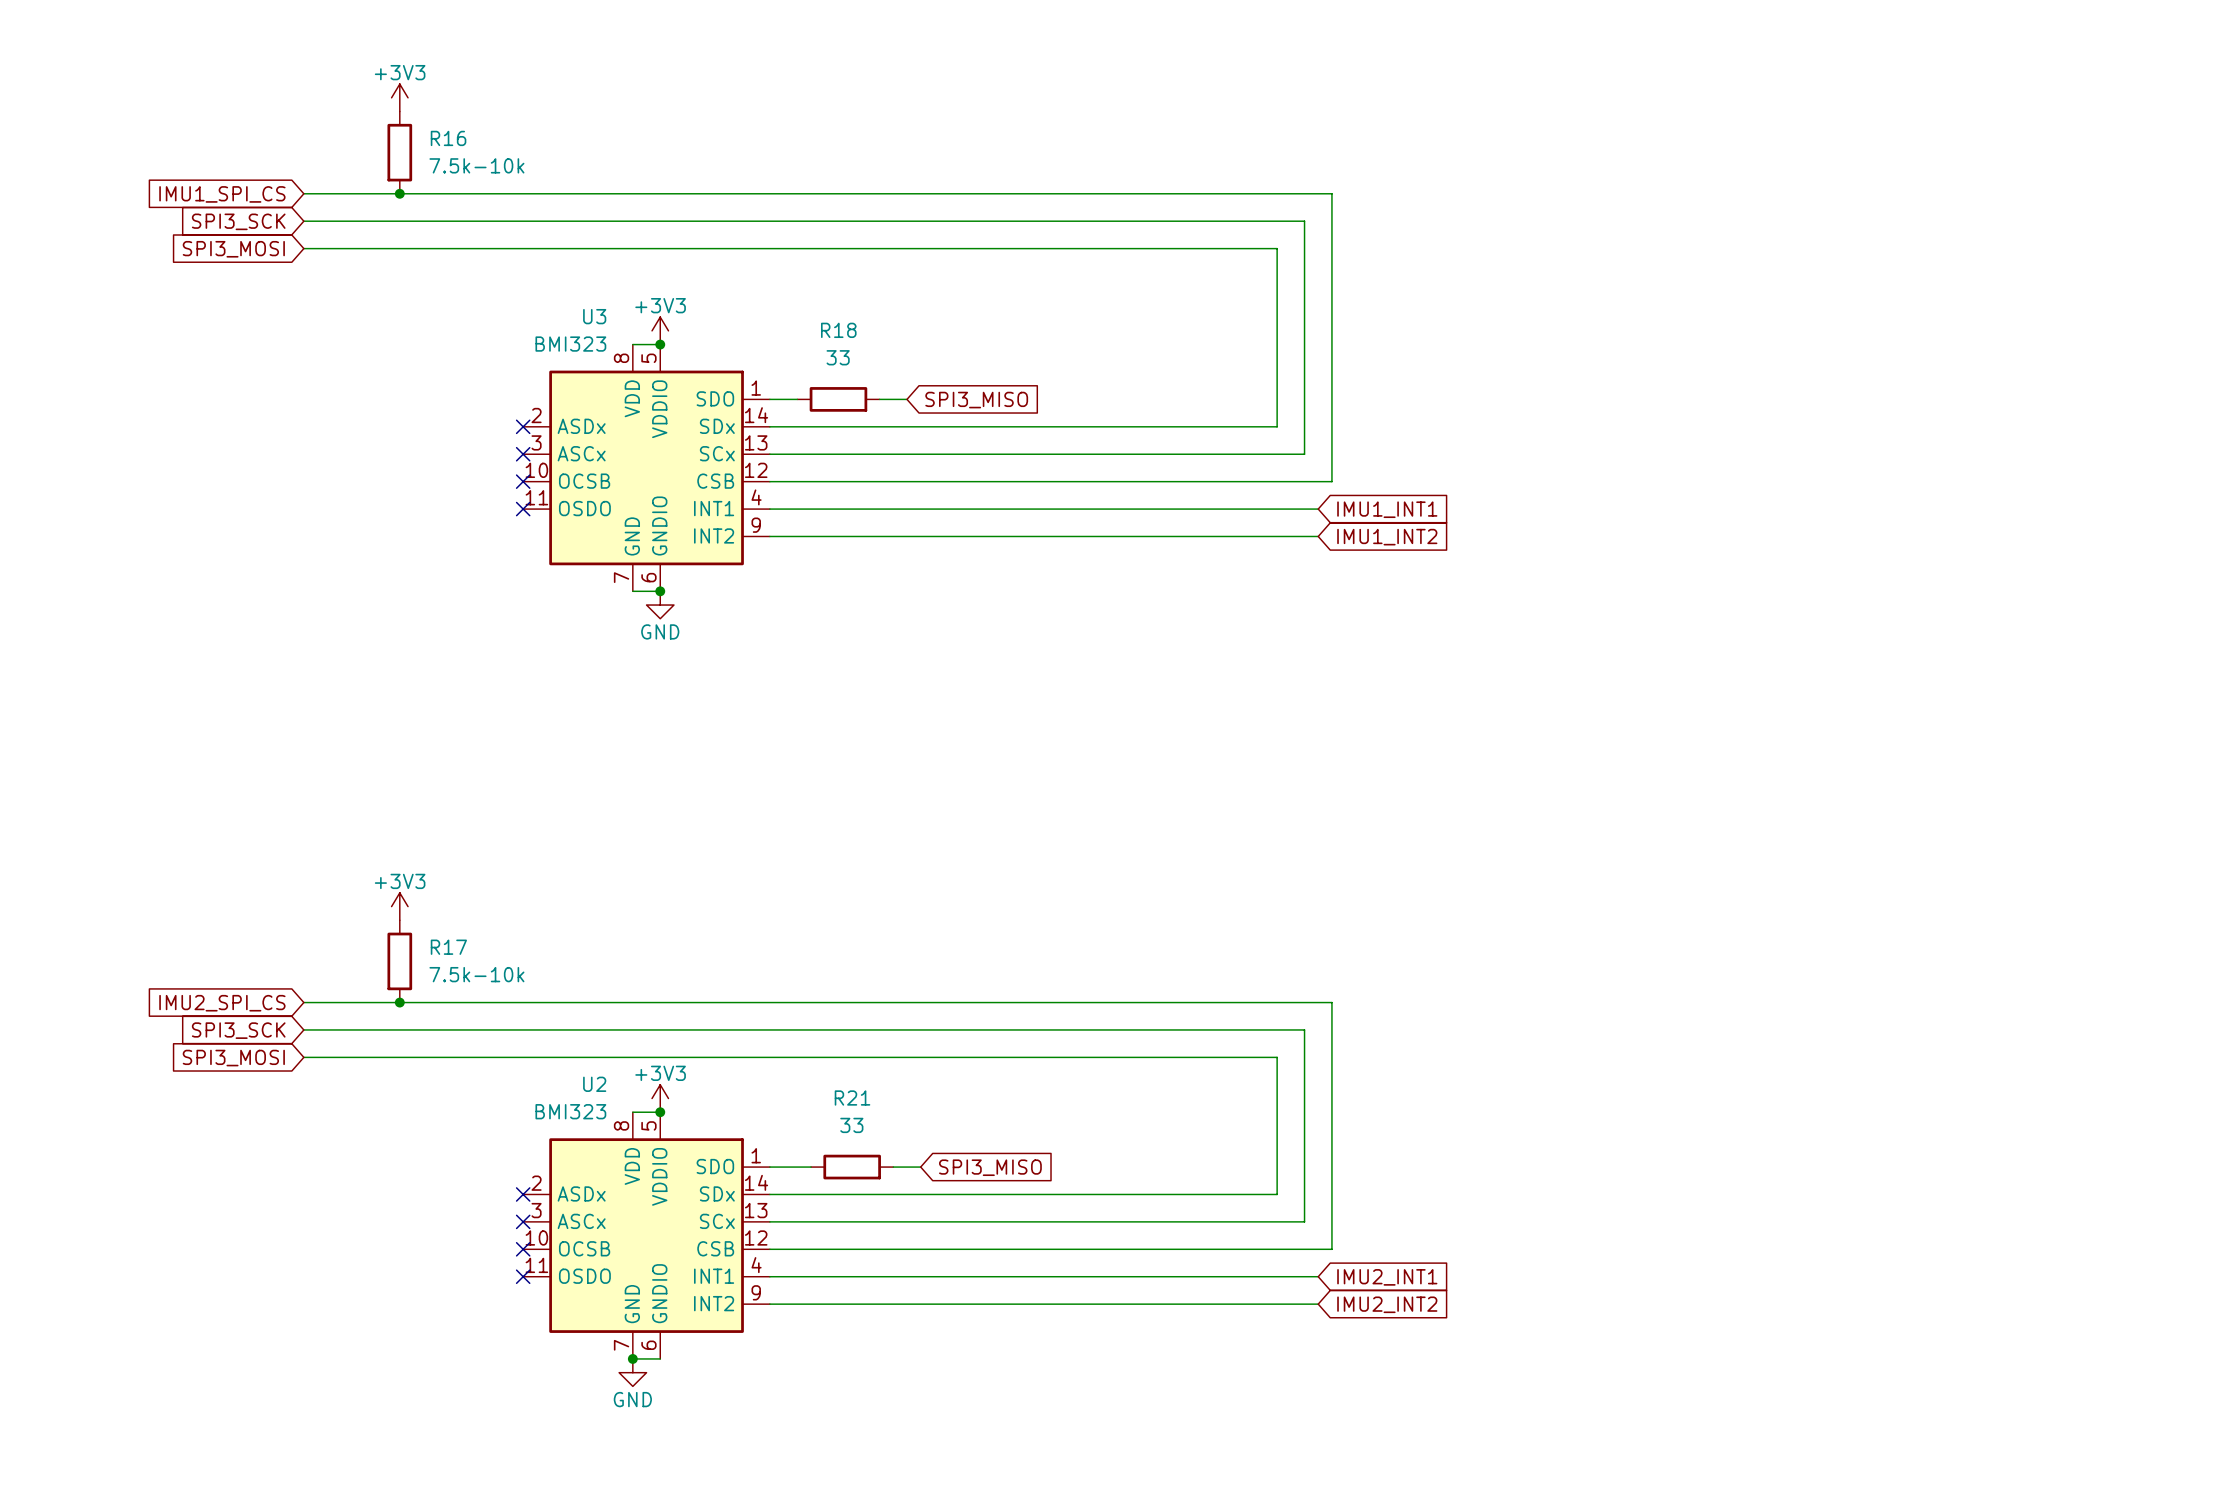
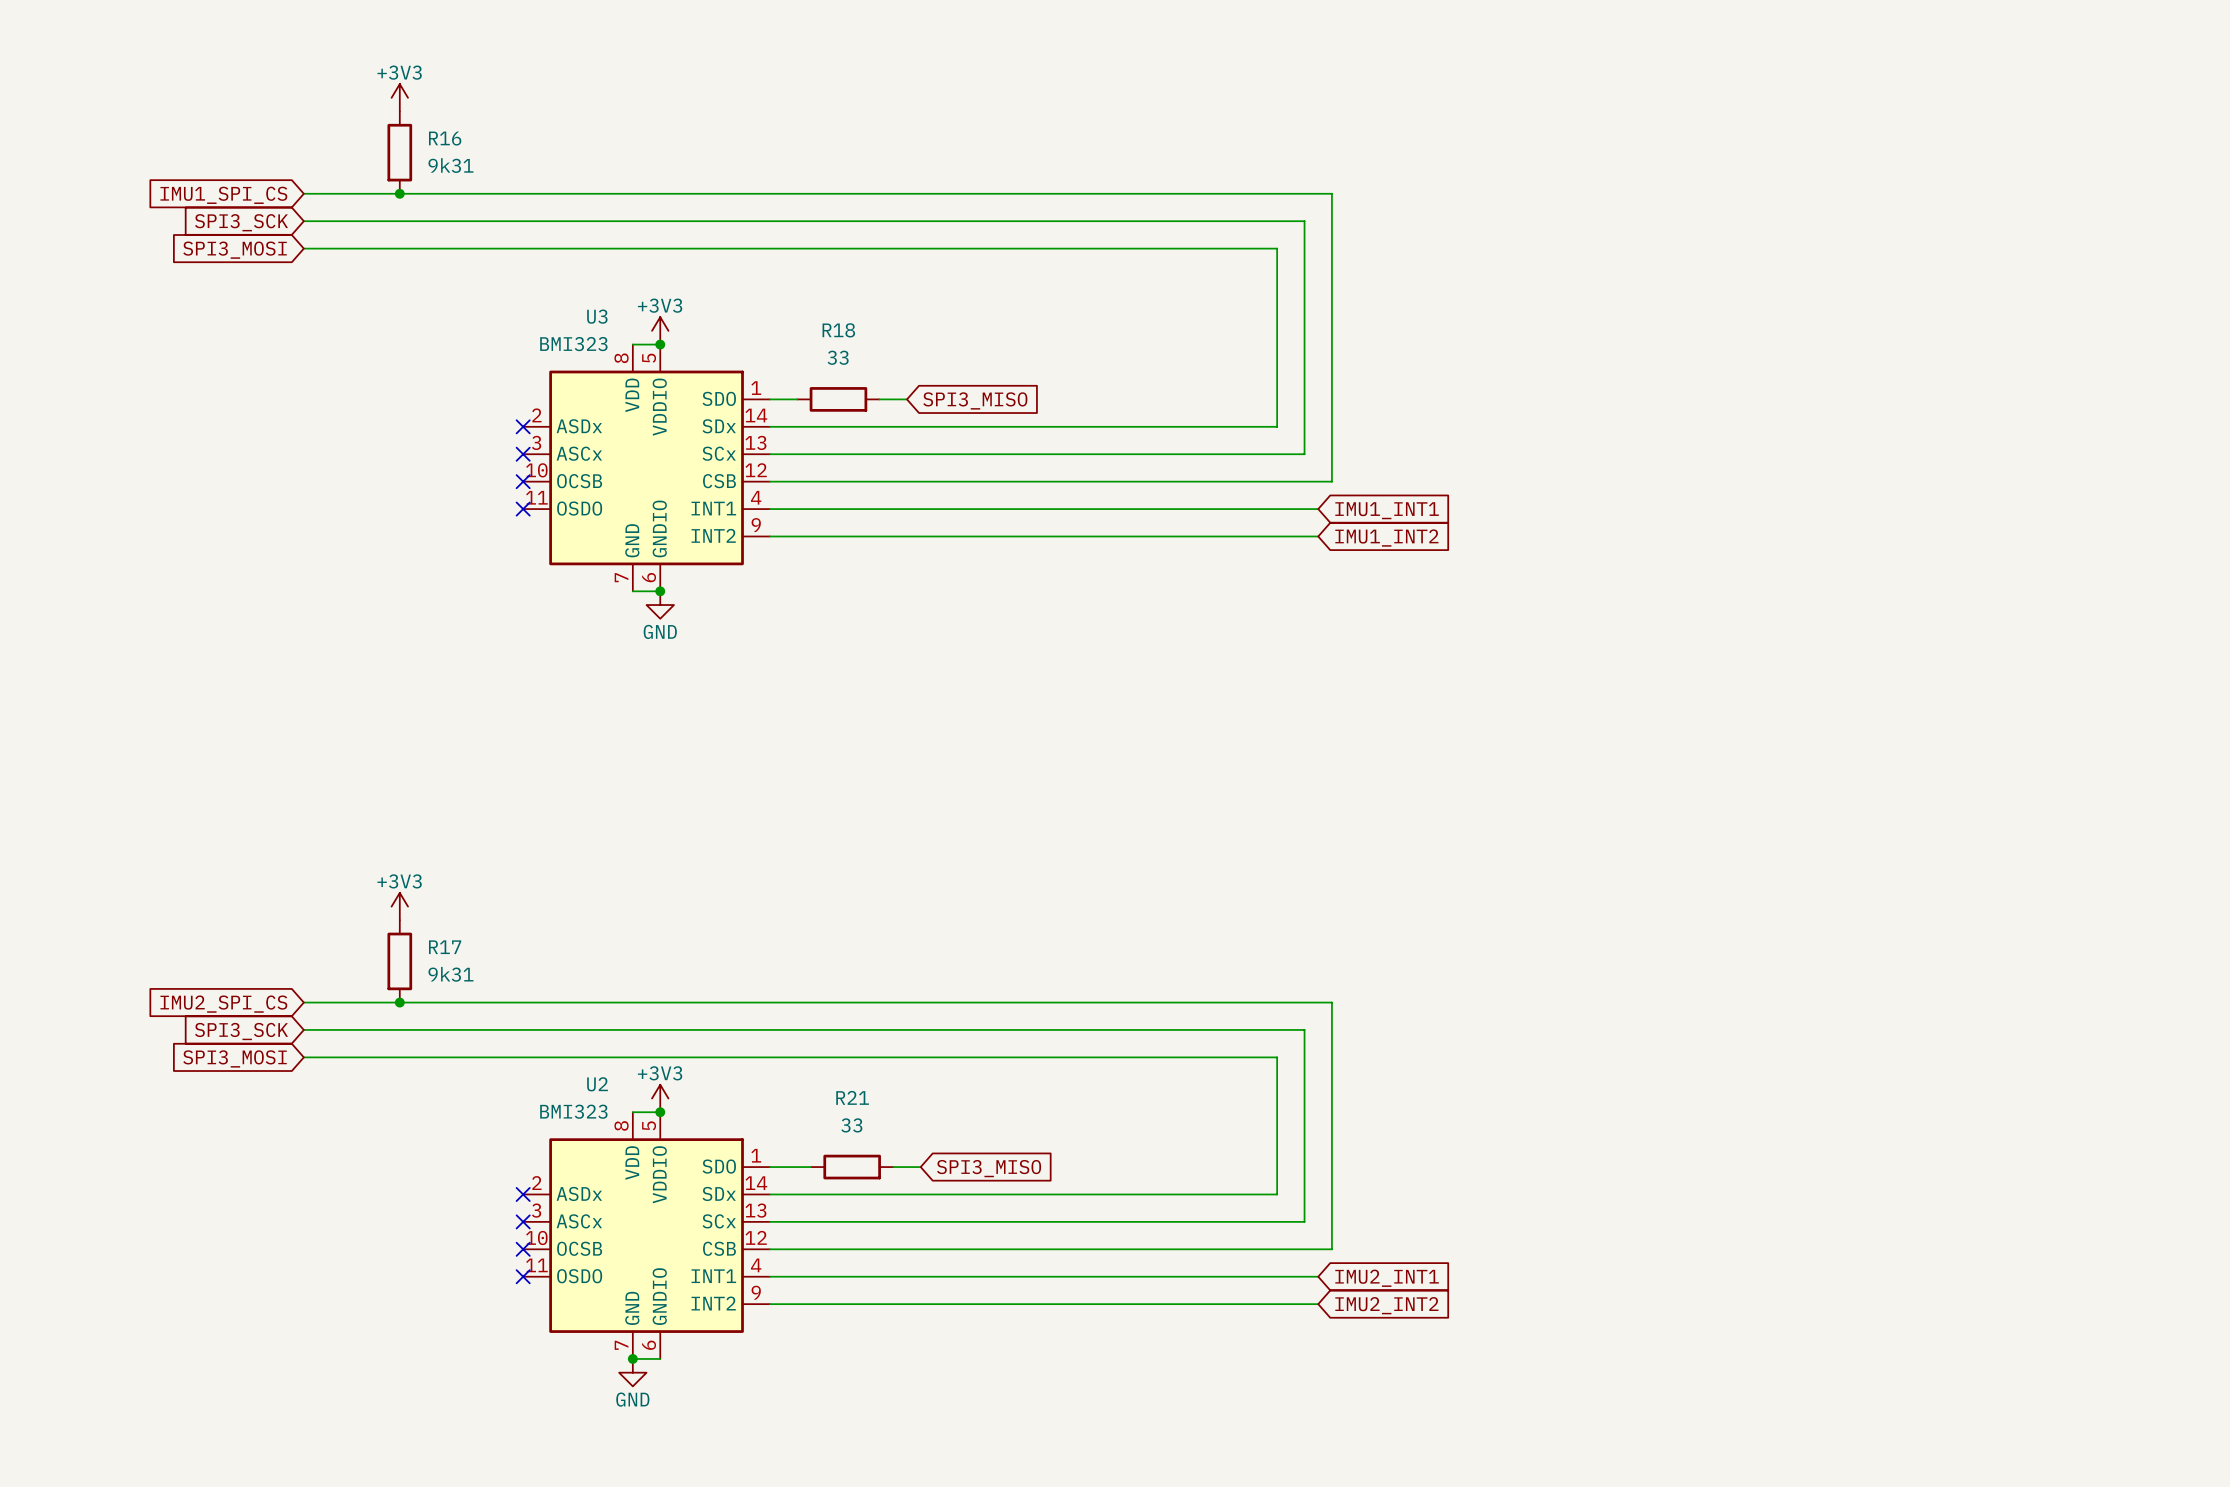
R16 value: 7.5k-10k (476, 165) -> 9k31 (450, 165)
R17 value: 7.5k-10k (476, 974) -> 9k31 (450, 974)

